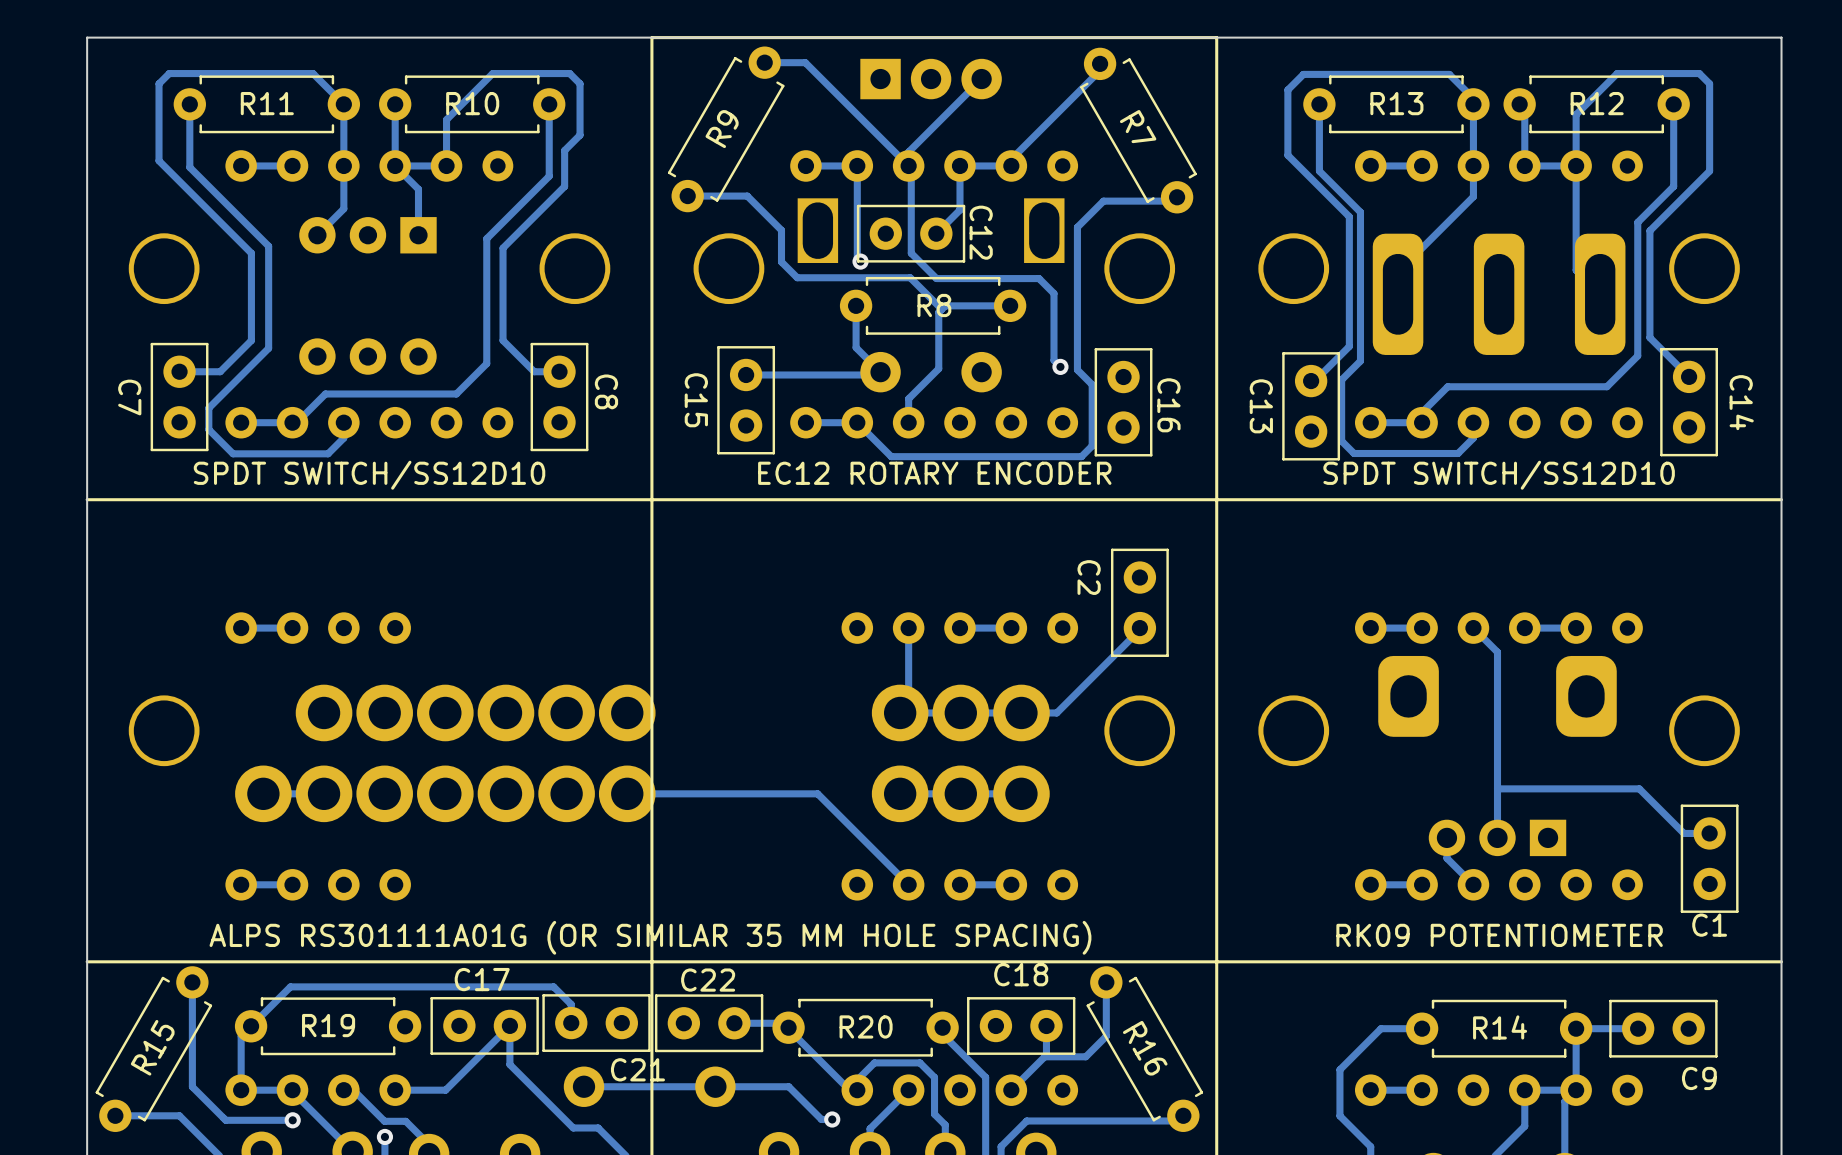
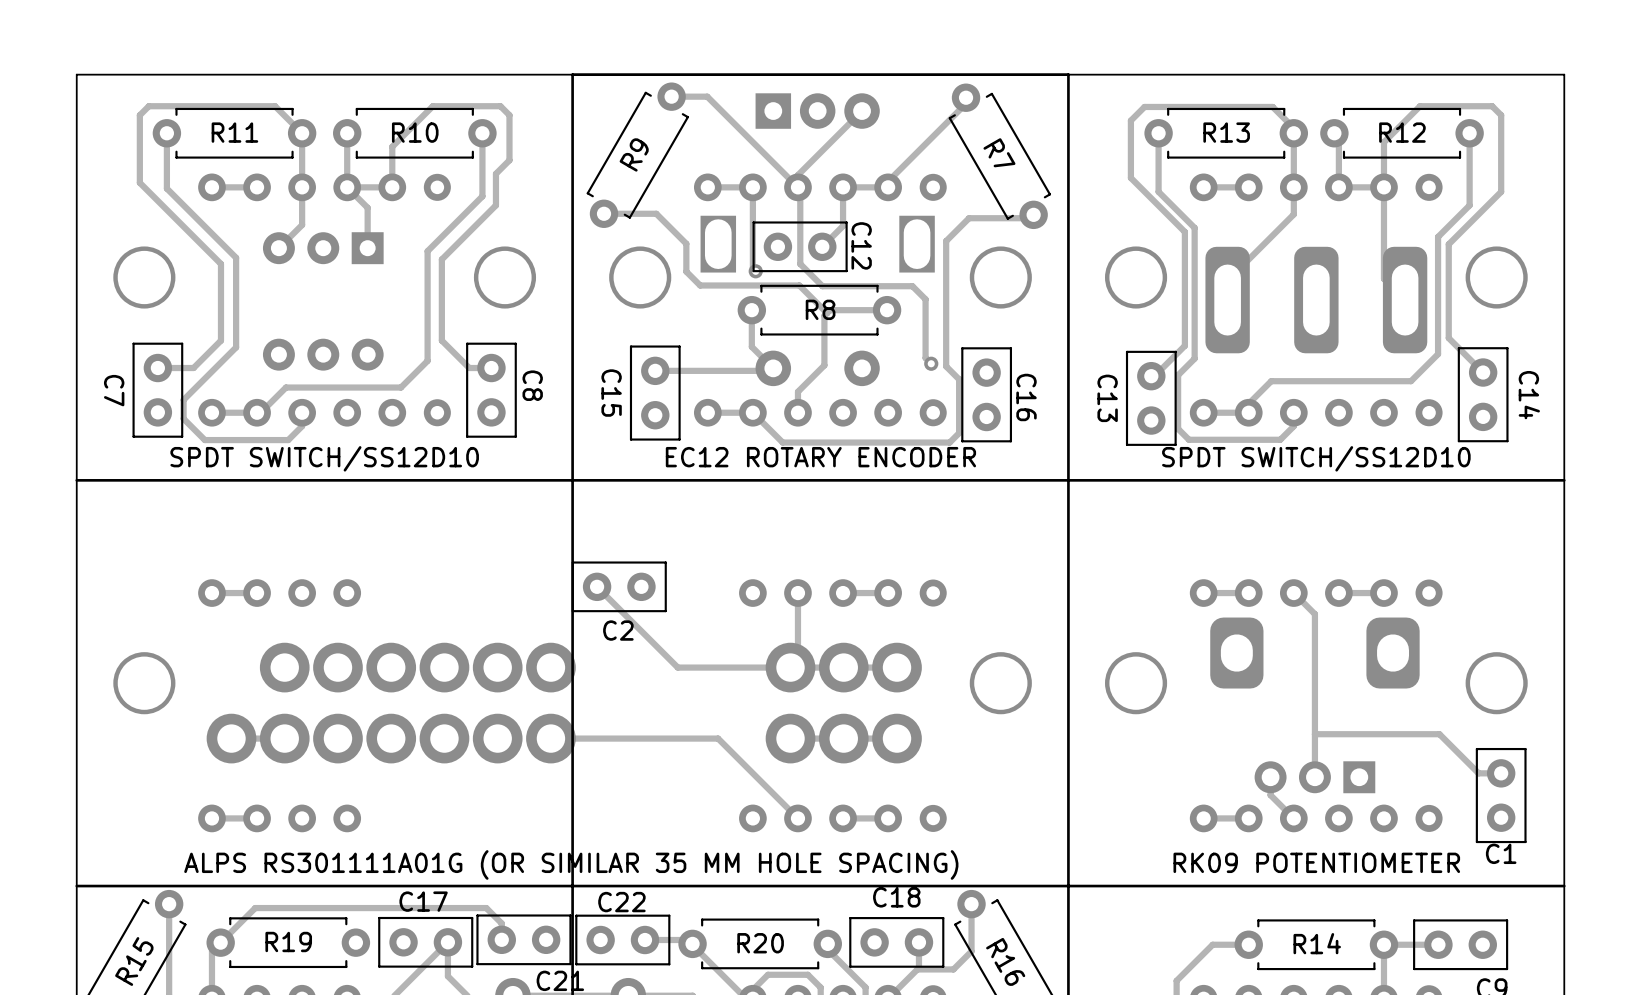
C2 name position: C2 (1089, 577) -> C2 (618, 630)
C2 rotation: 0° (1139, 602) -> 90° clockwise (619, 586)
C2 position: (1139, 602) -> (619, 586)
track: none -> (597, 586) (677, 667) (790, 667)
track: (1139, 628) (1056, 712) (1021, 712) -> none

